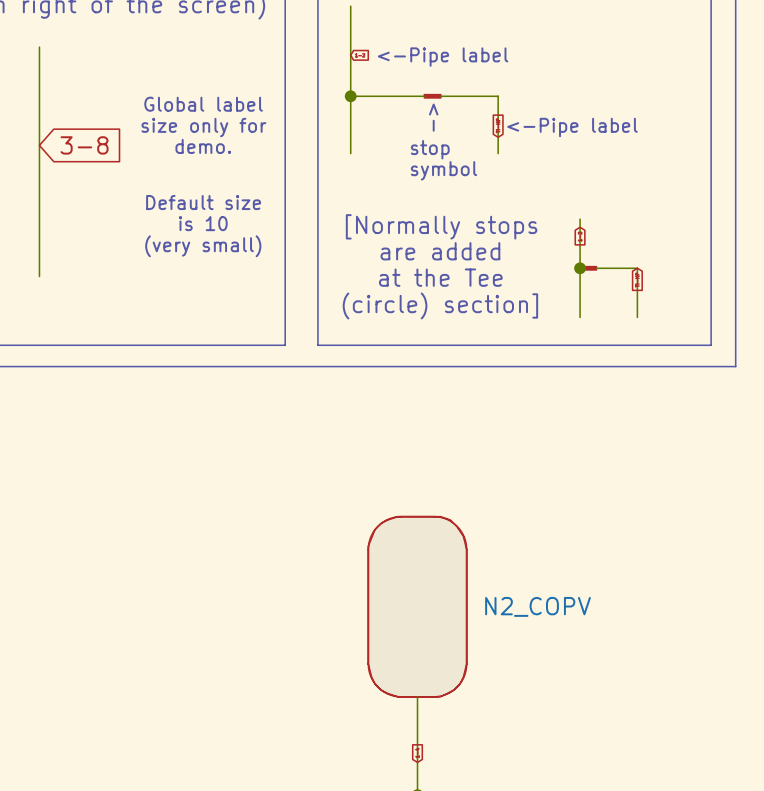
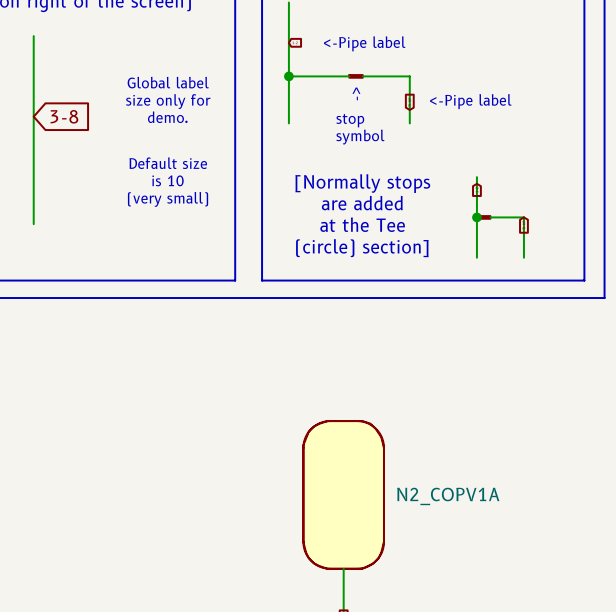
N2_COPV1A: none -> (343, 494)

